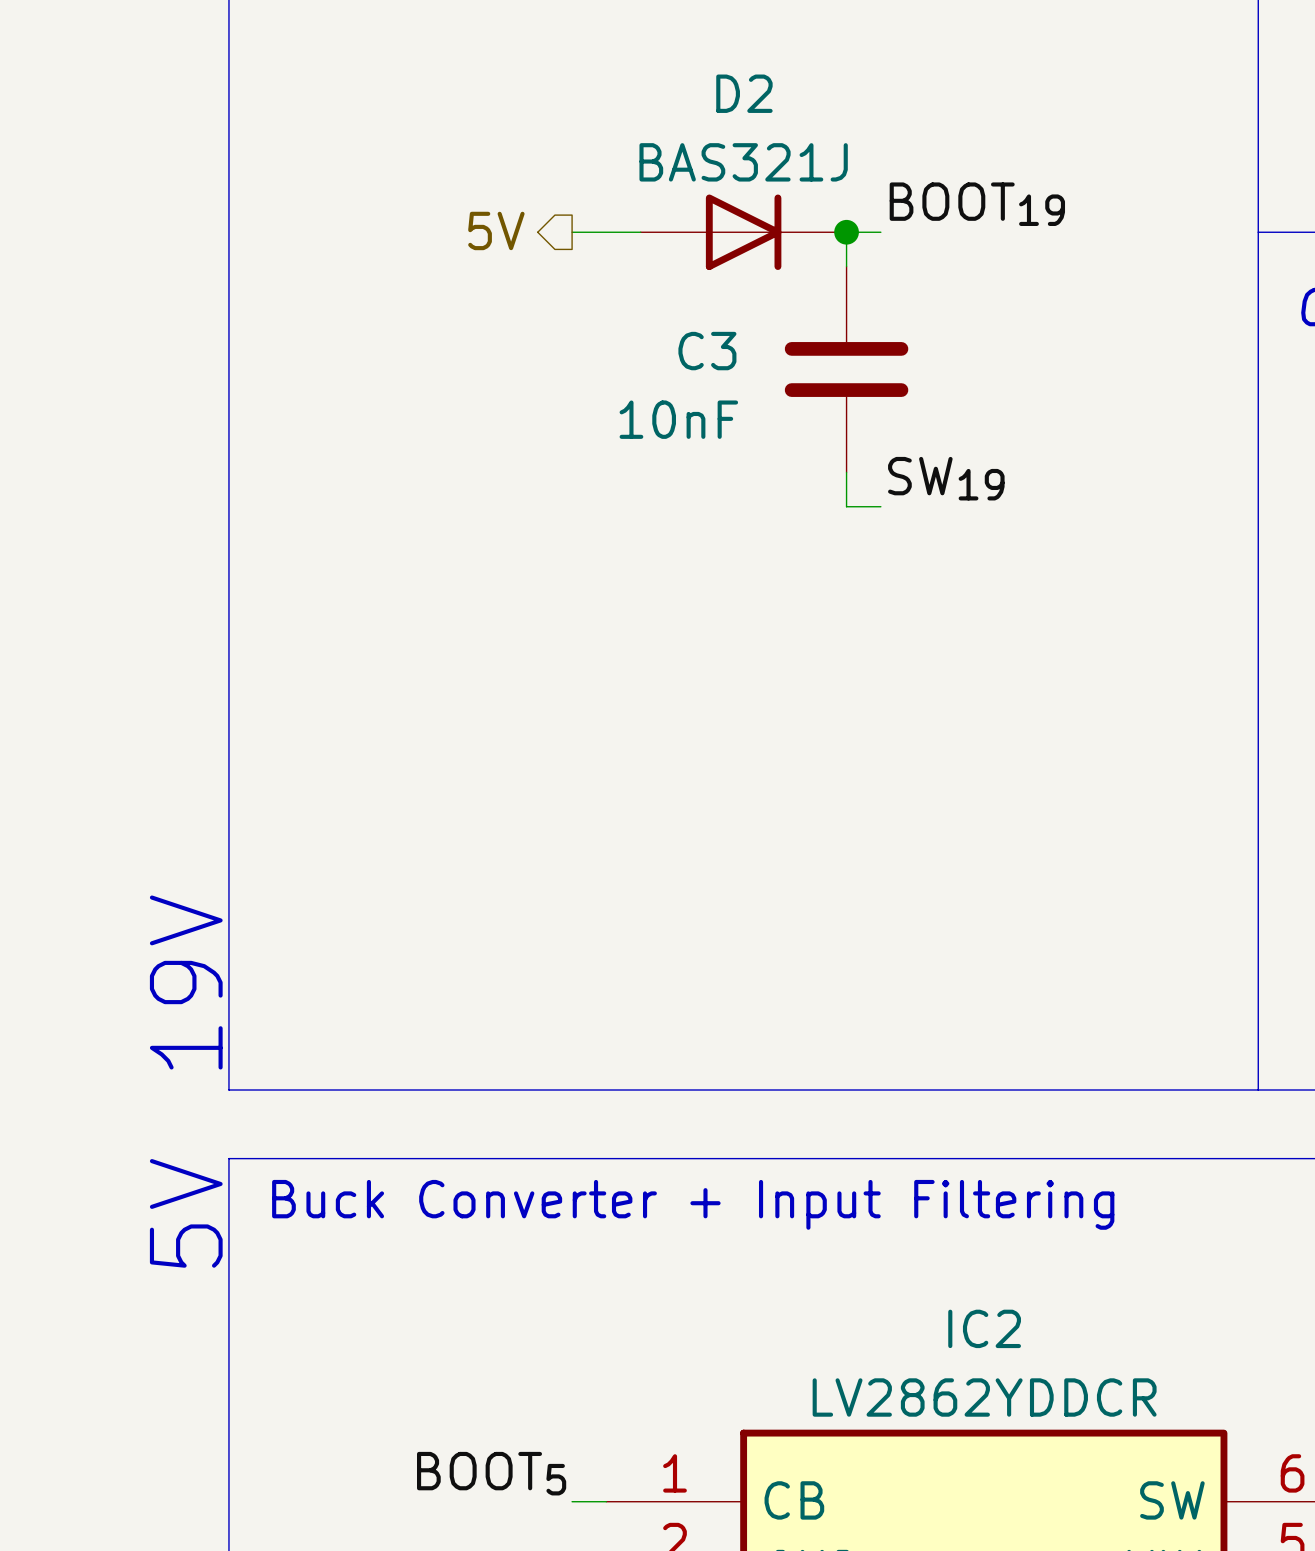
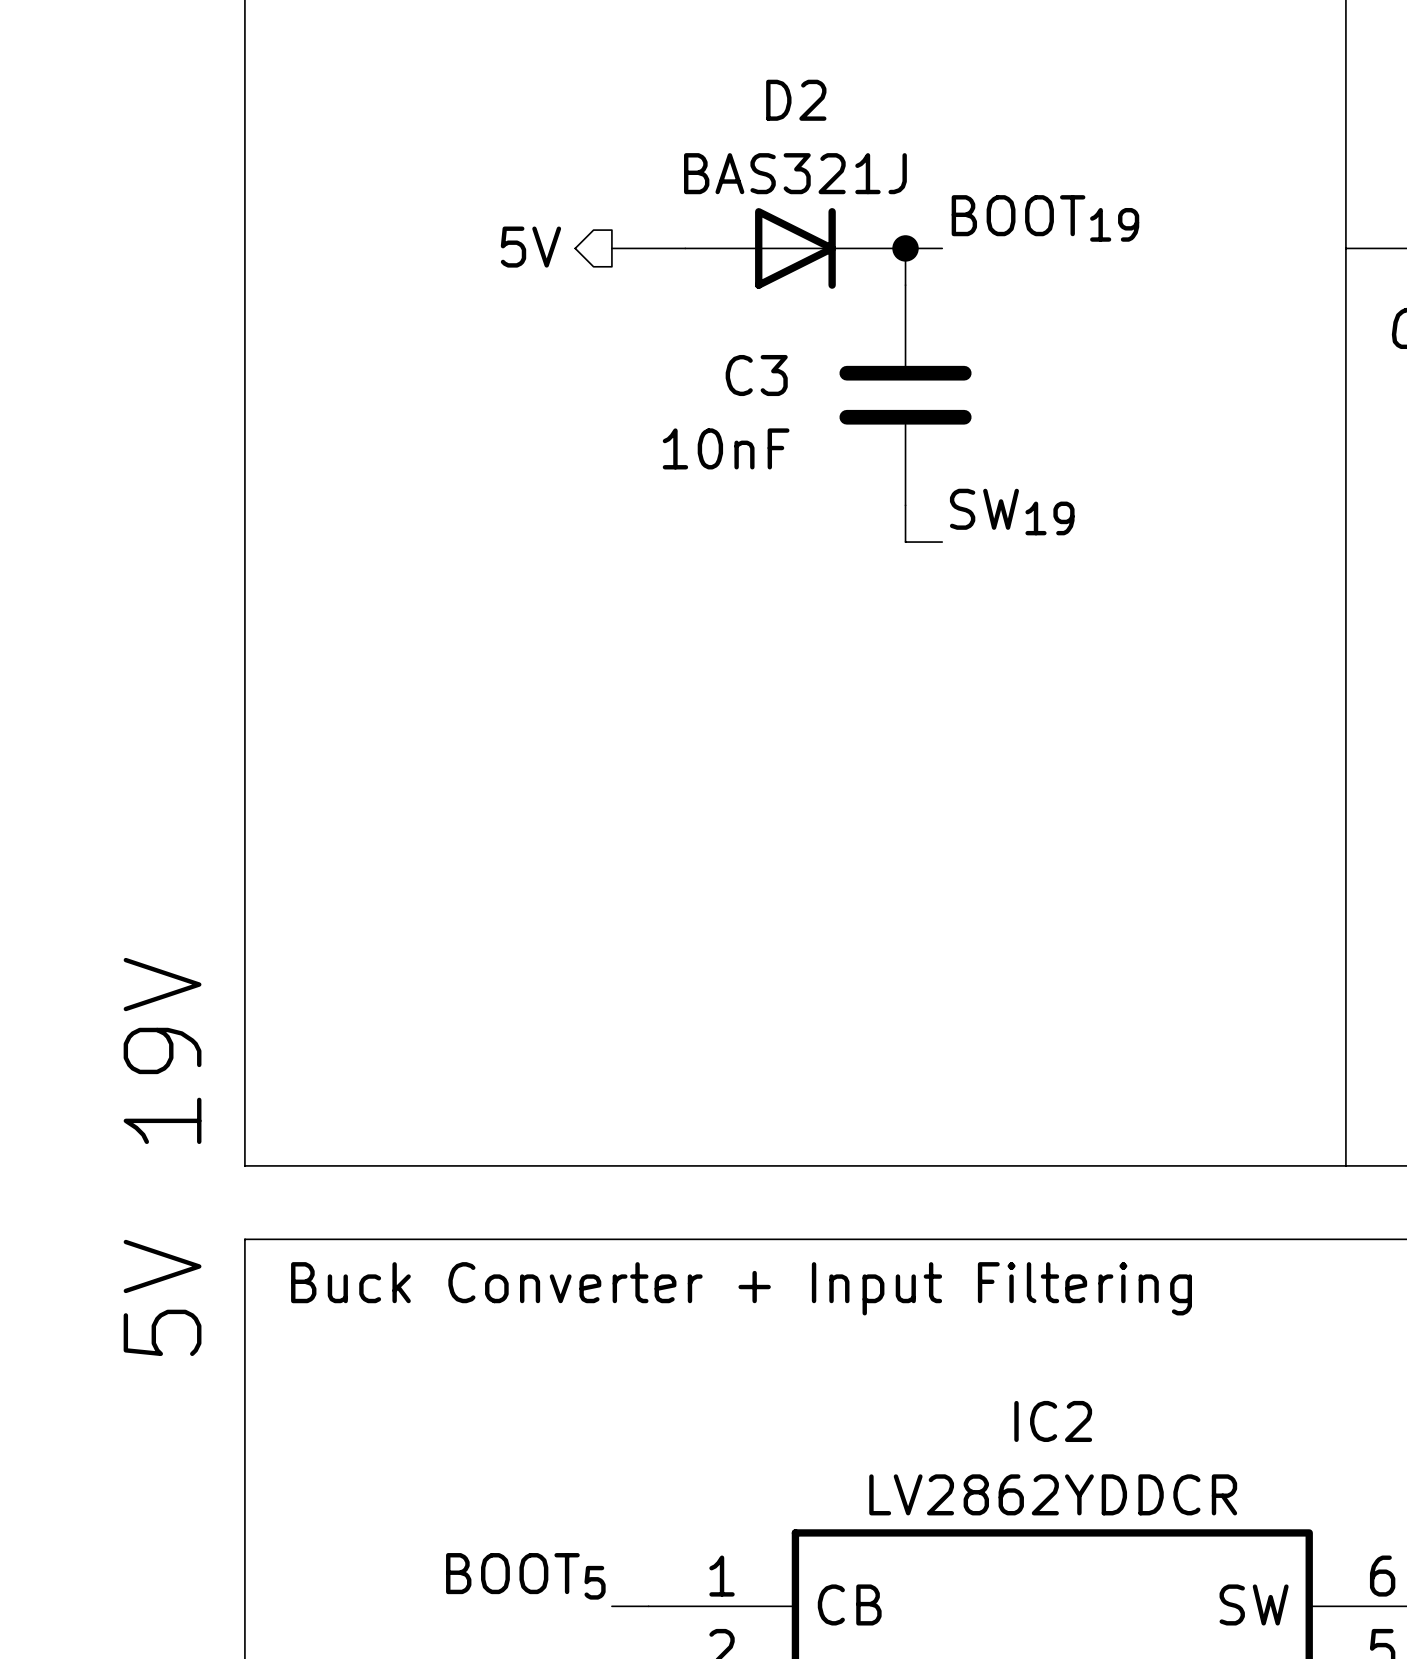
text position: 19V (186, 982) -> 19V (162, 1050)
text position: 5V (186, 1213) -> 5V (162, 1297)

